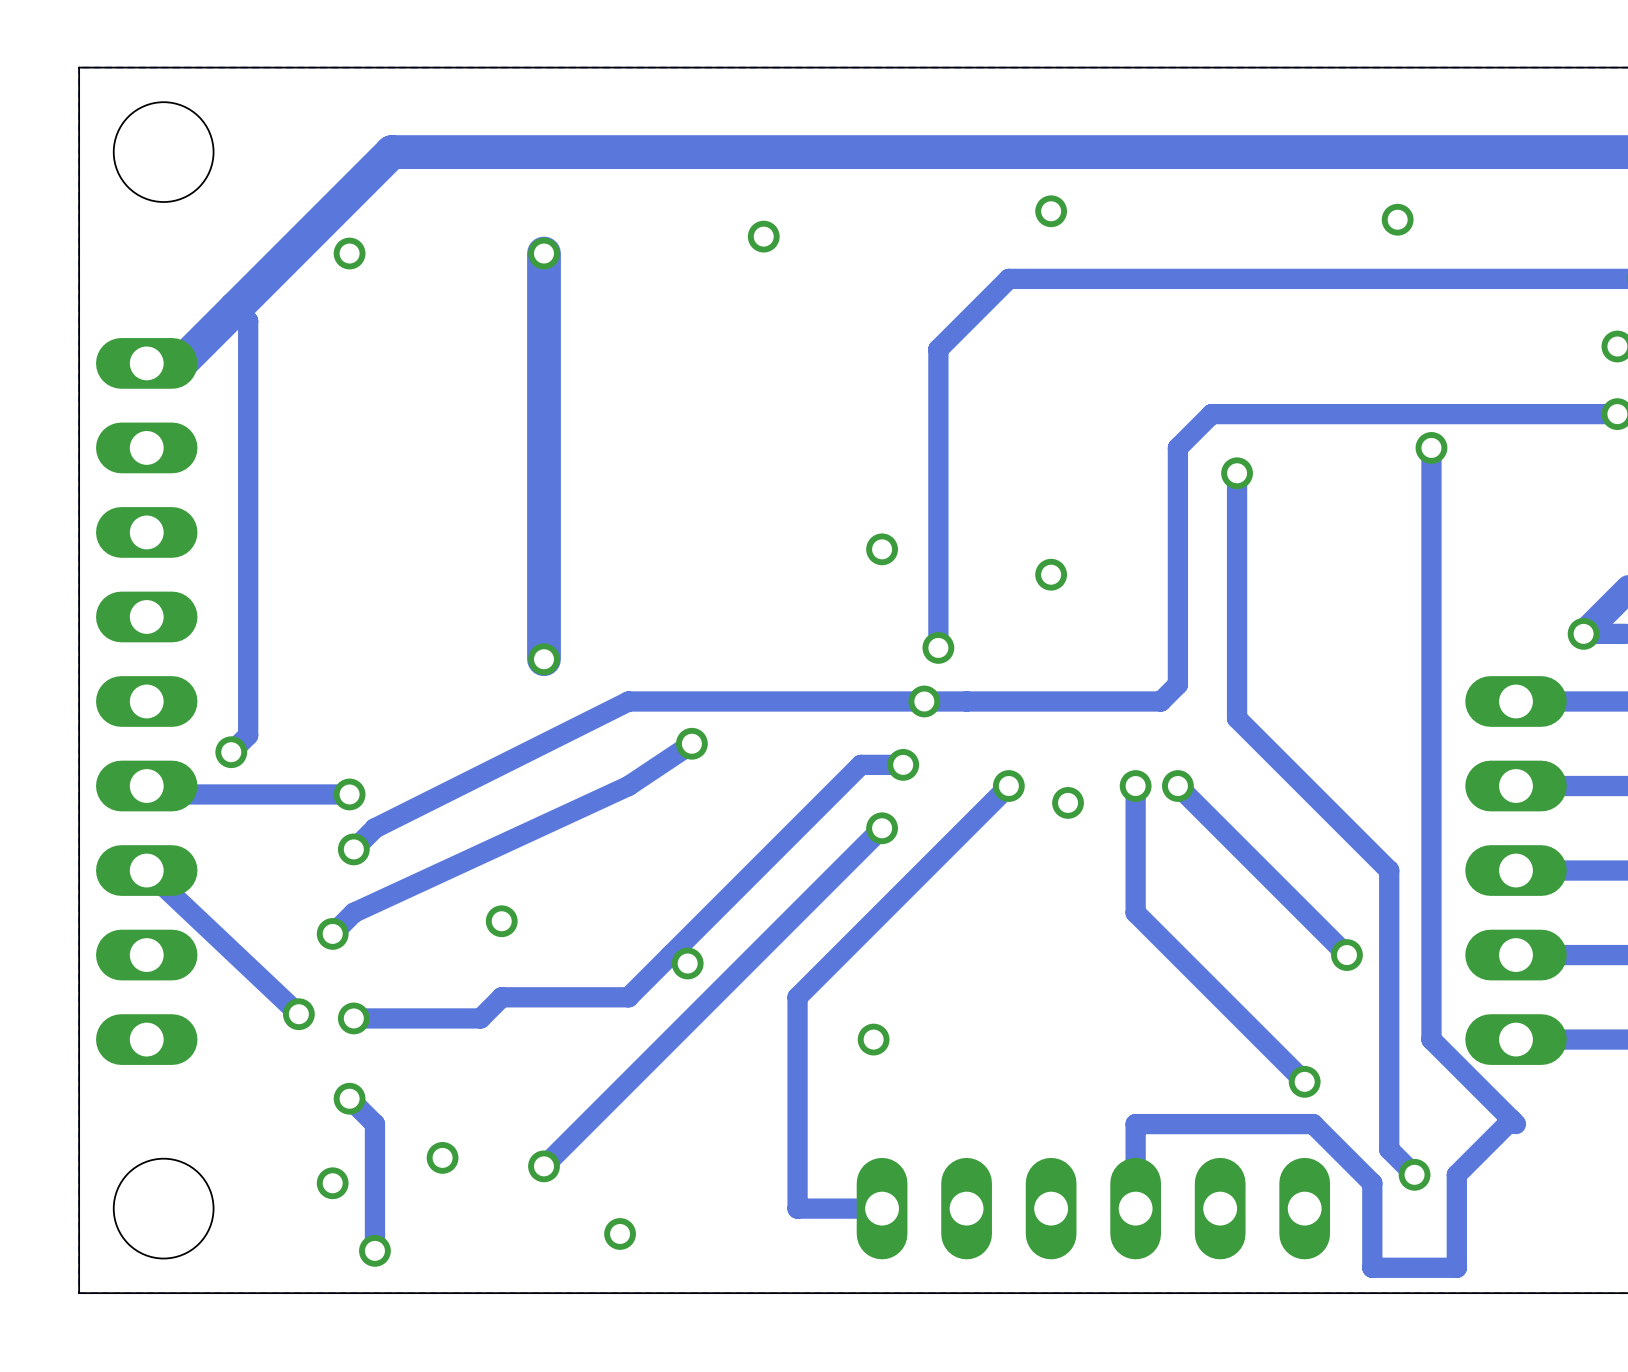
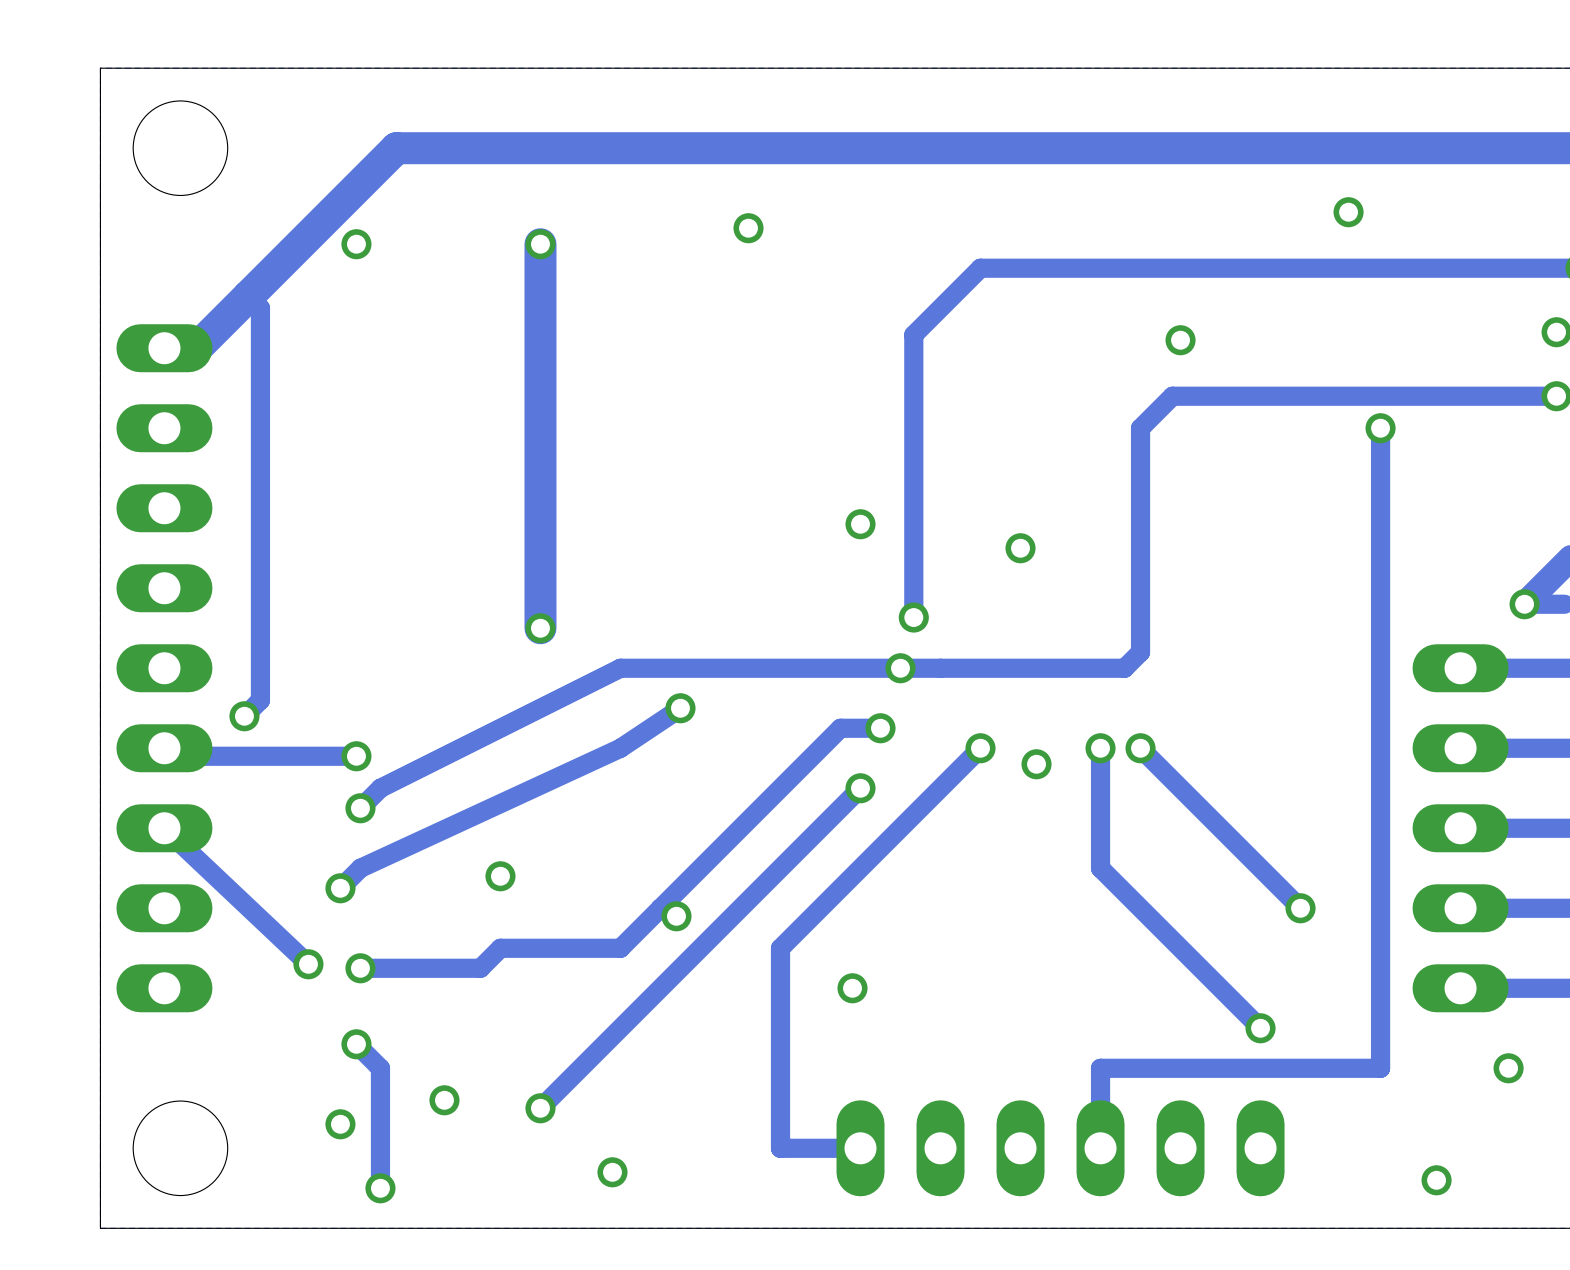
via: (1051, 211) -> none
via: none -> (1180, 340)
track: (1237, 473) (1237, 718) (1389, 870) (1389, 1149) (1414, 1174) -> none
via: (1237, 473) -> none
track: (1431, 1039) (1515, 1124) -> none
track: (1511, 1119) (1456, 1174) (1456, 1267) (1372, 1267) (1372, 1183) (1313, 1124) -> (1380, 988) (1380, 1068) (1268, 1068)
via: none -> (1508, 1068)
via: (1414, 1174) -> none
via: none -> (1436, 1180)

